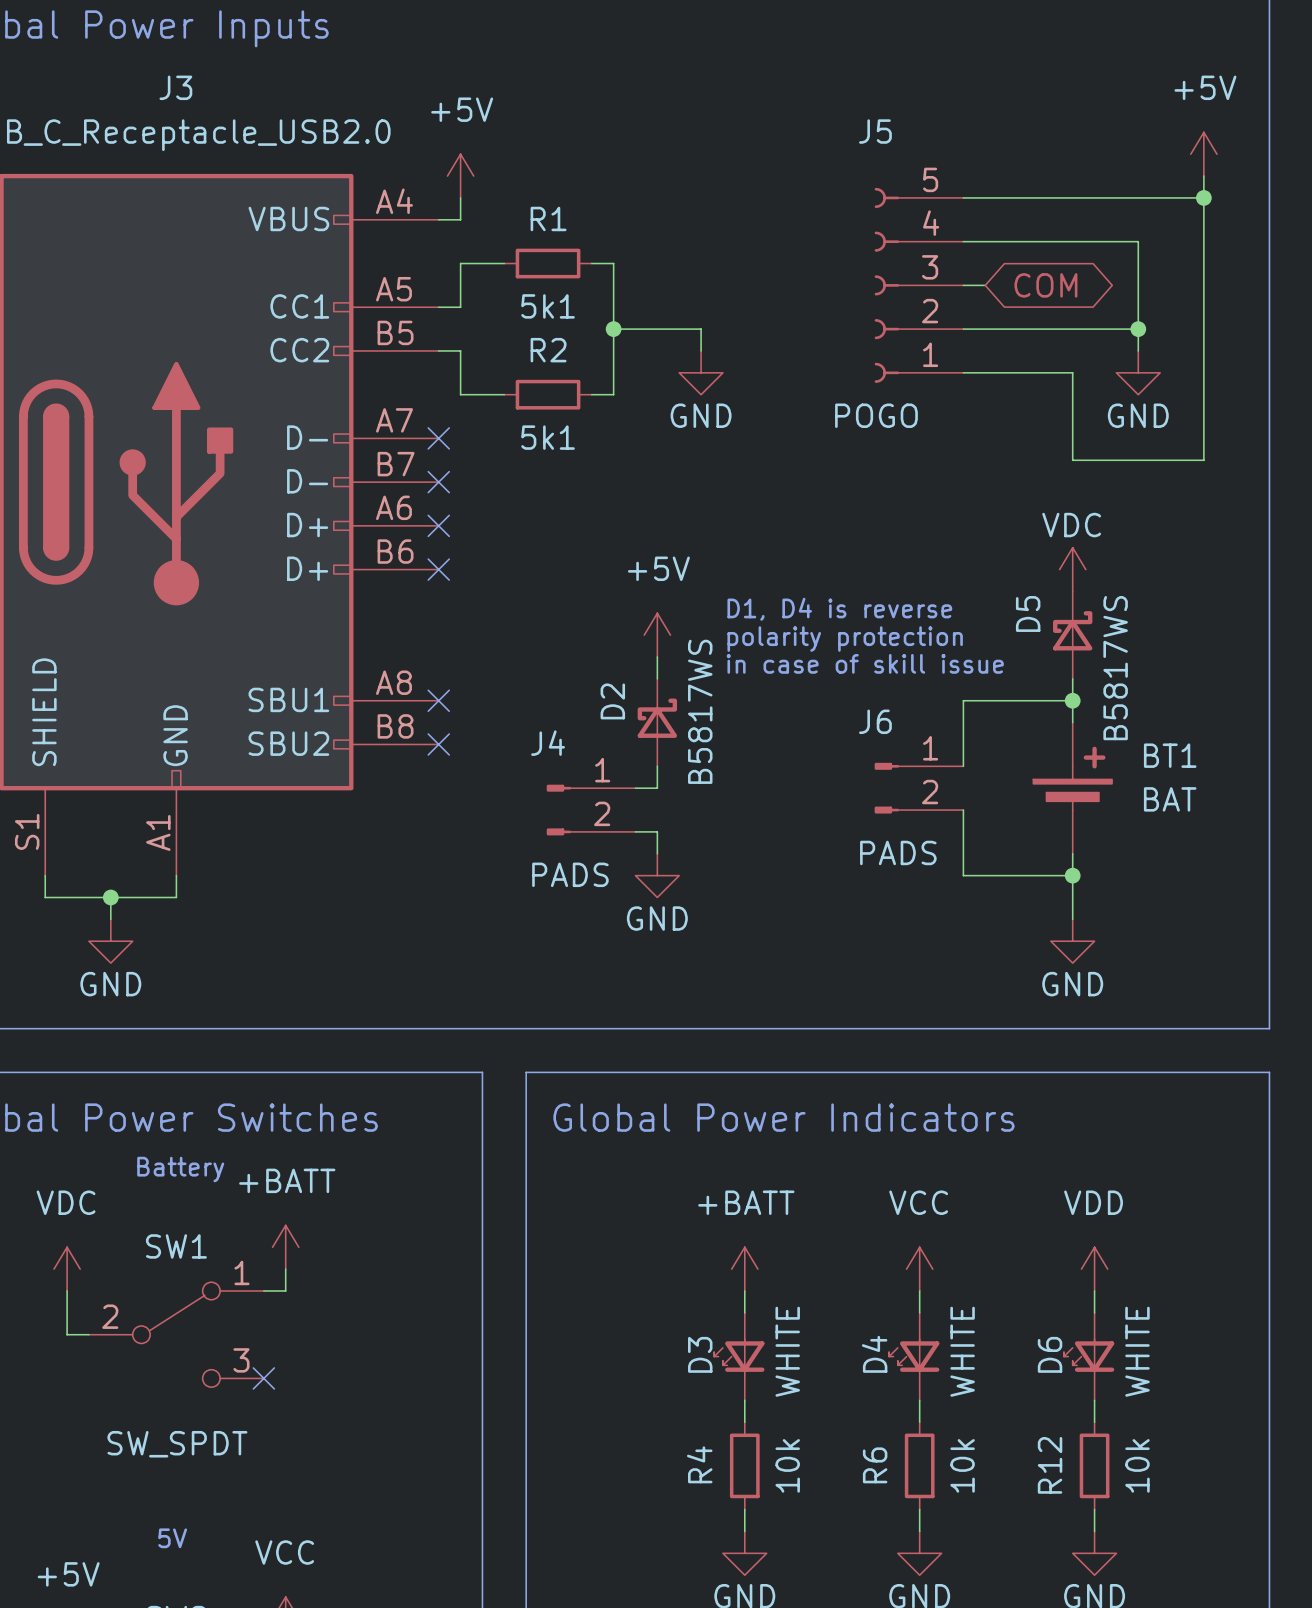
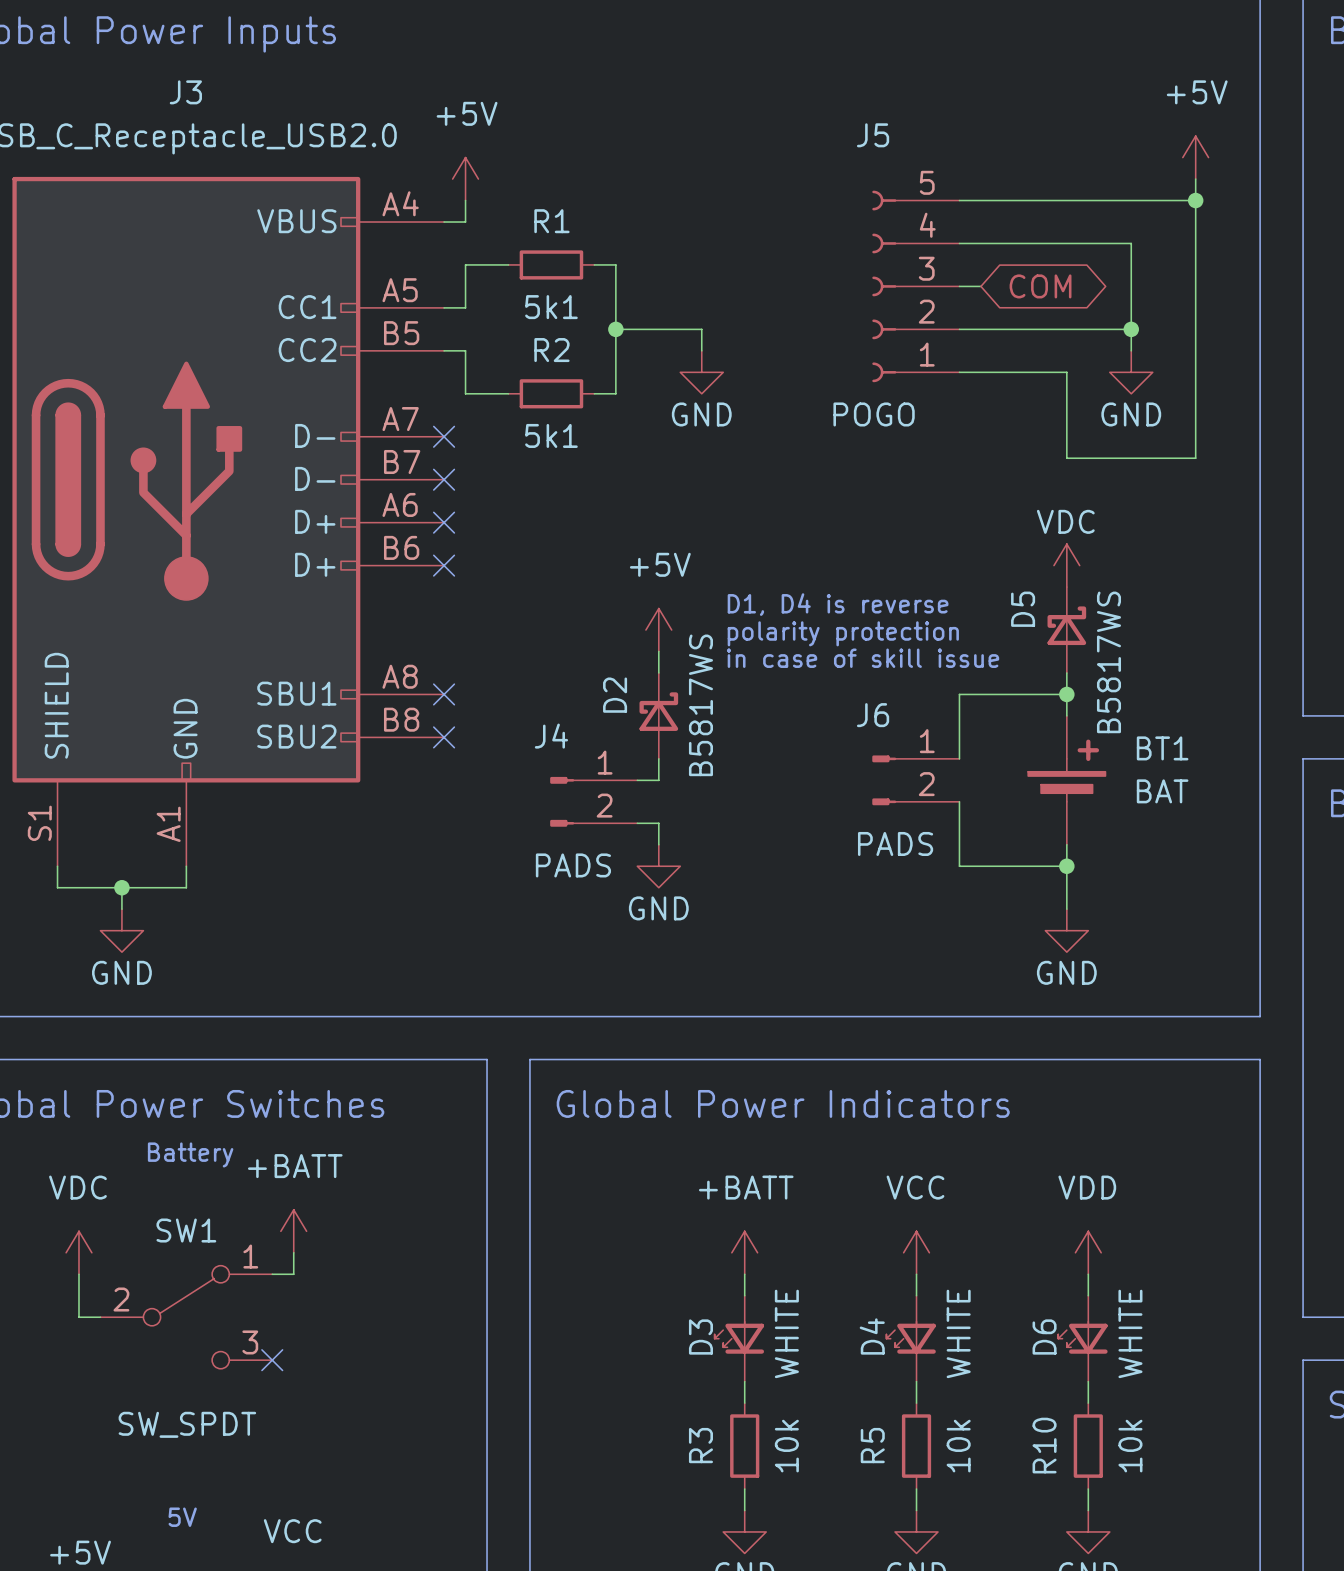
R4 name: R4 (699, 1464) -> R3 (700, 1445)
R6 name: R6 (875, 1465) -> R5 (872, 1445)
R12 name: R12 (1050, 1465) -> R10 (1044, 1445)

